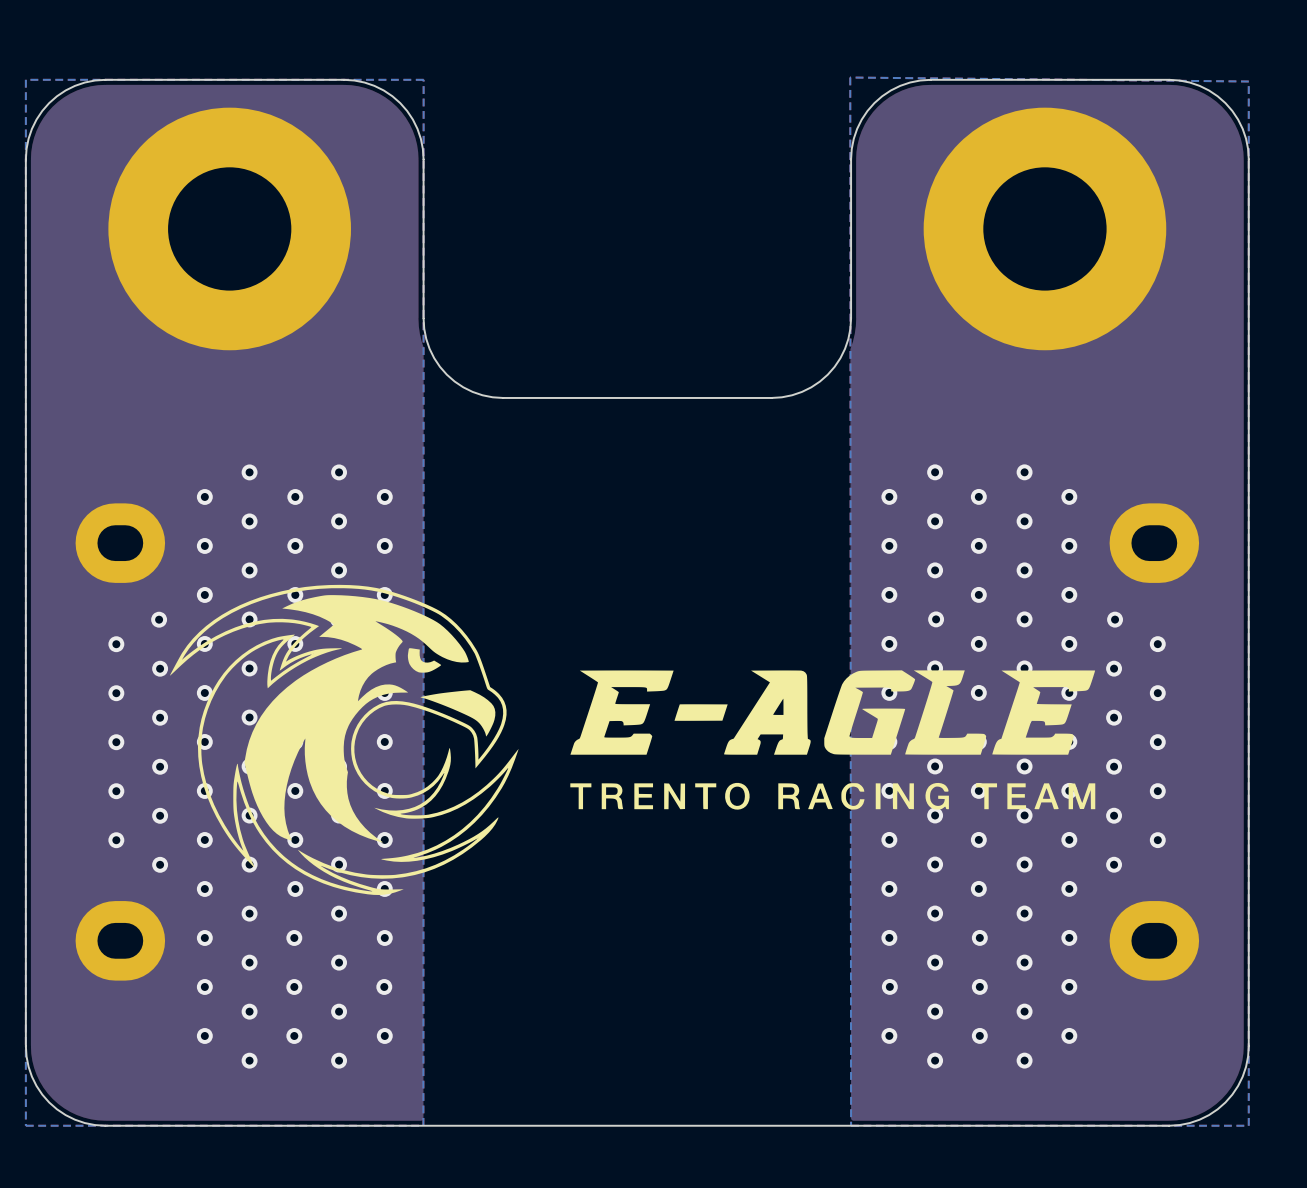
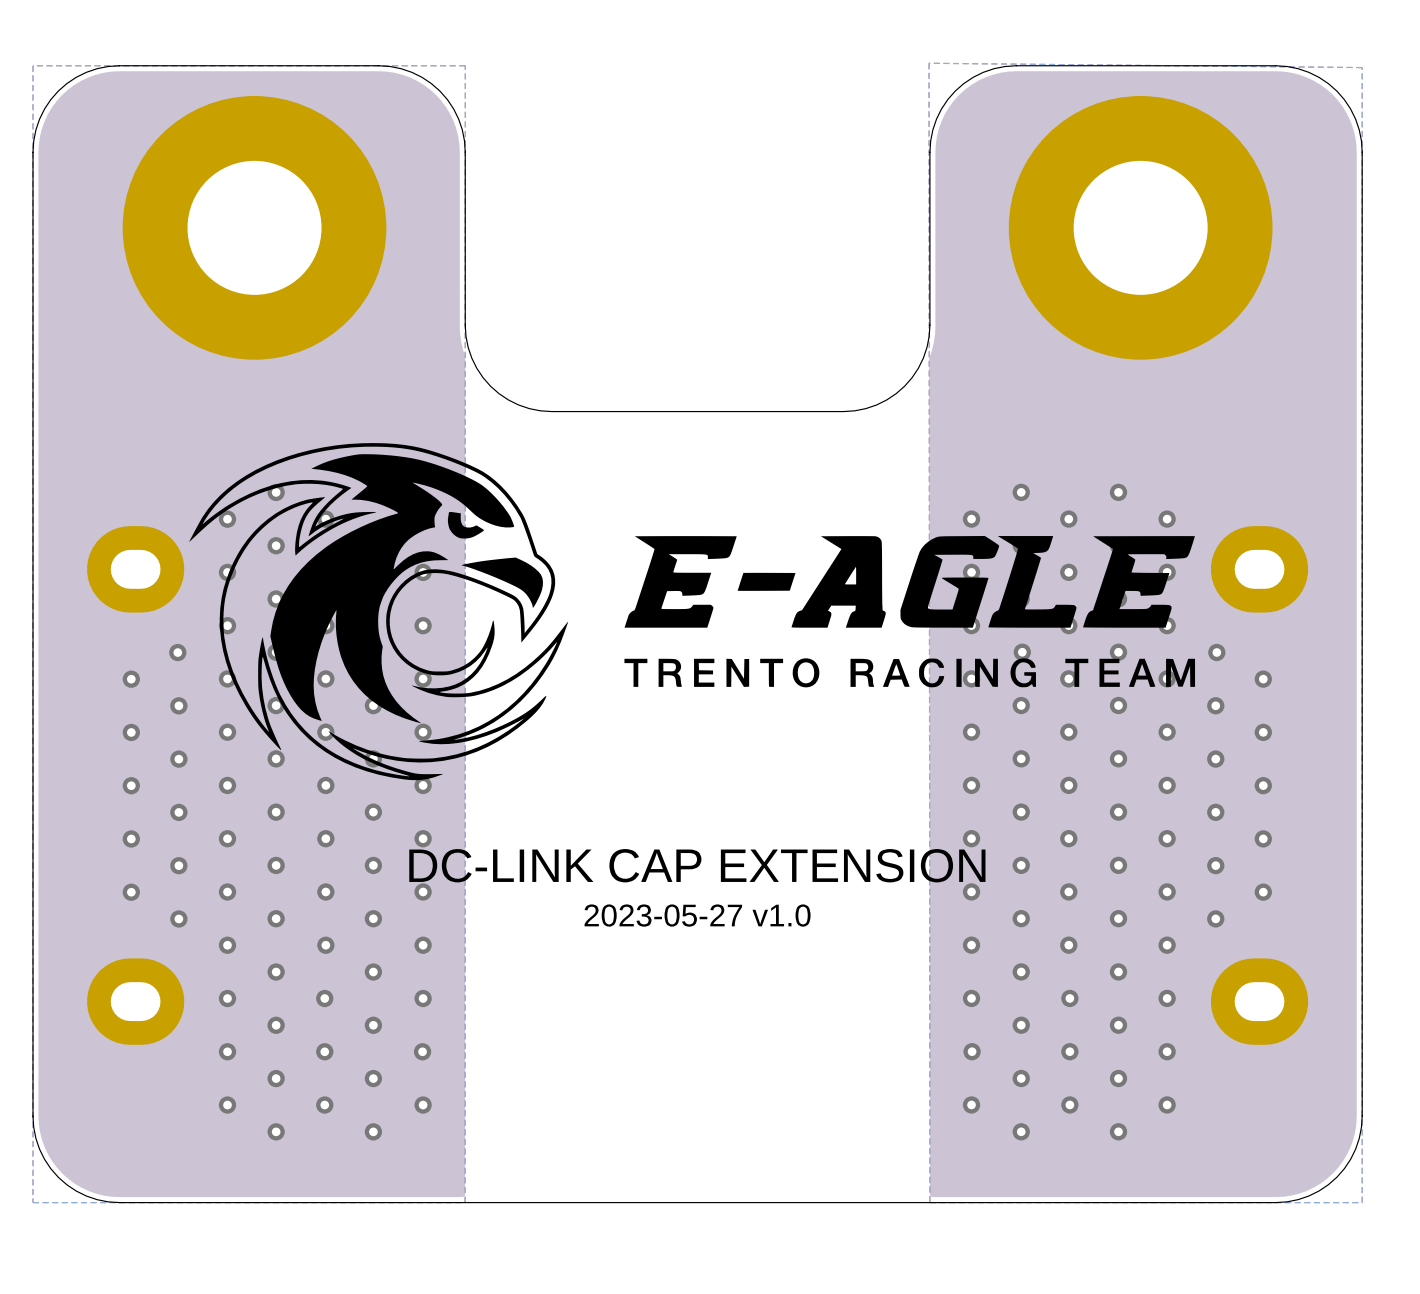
drawing position: (632, 739) -> (692, 611)
text: none -> DC-LINK CAP EXTENSION (697, 865)
text: none -> 2023-05-27 v1.0 (697, 915)

